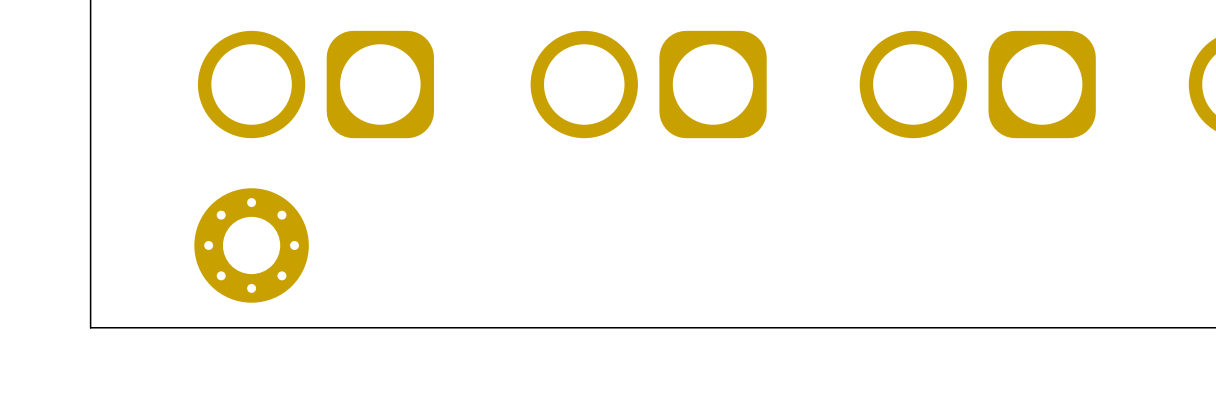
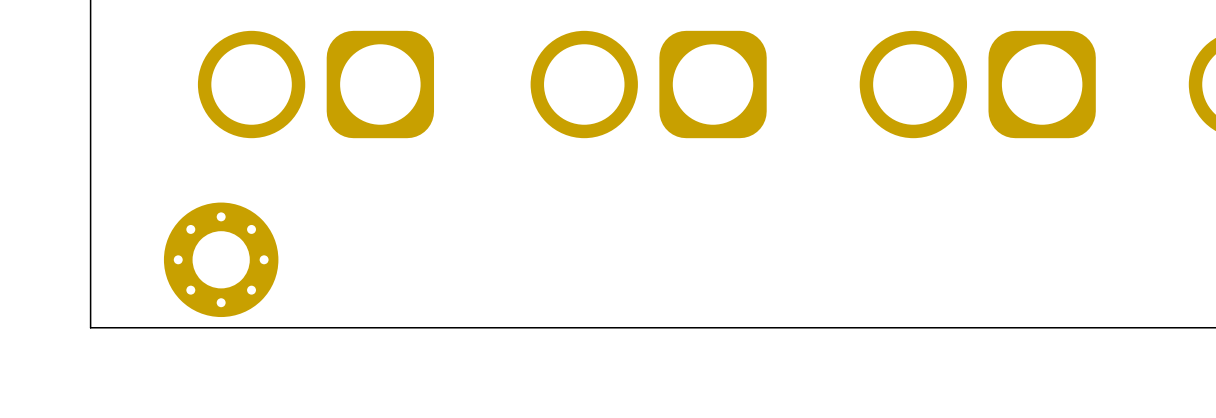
part position: (251, 245) -> (221, 259)

